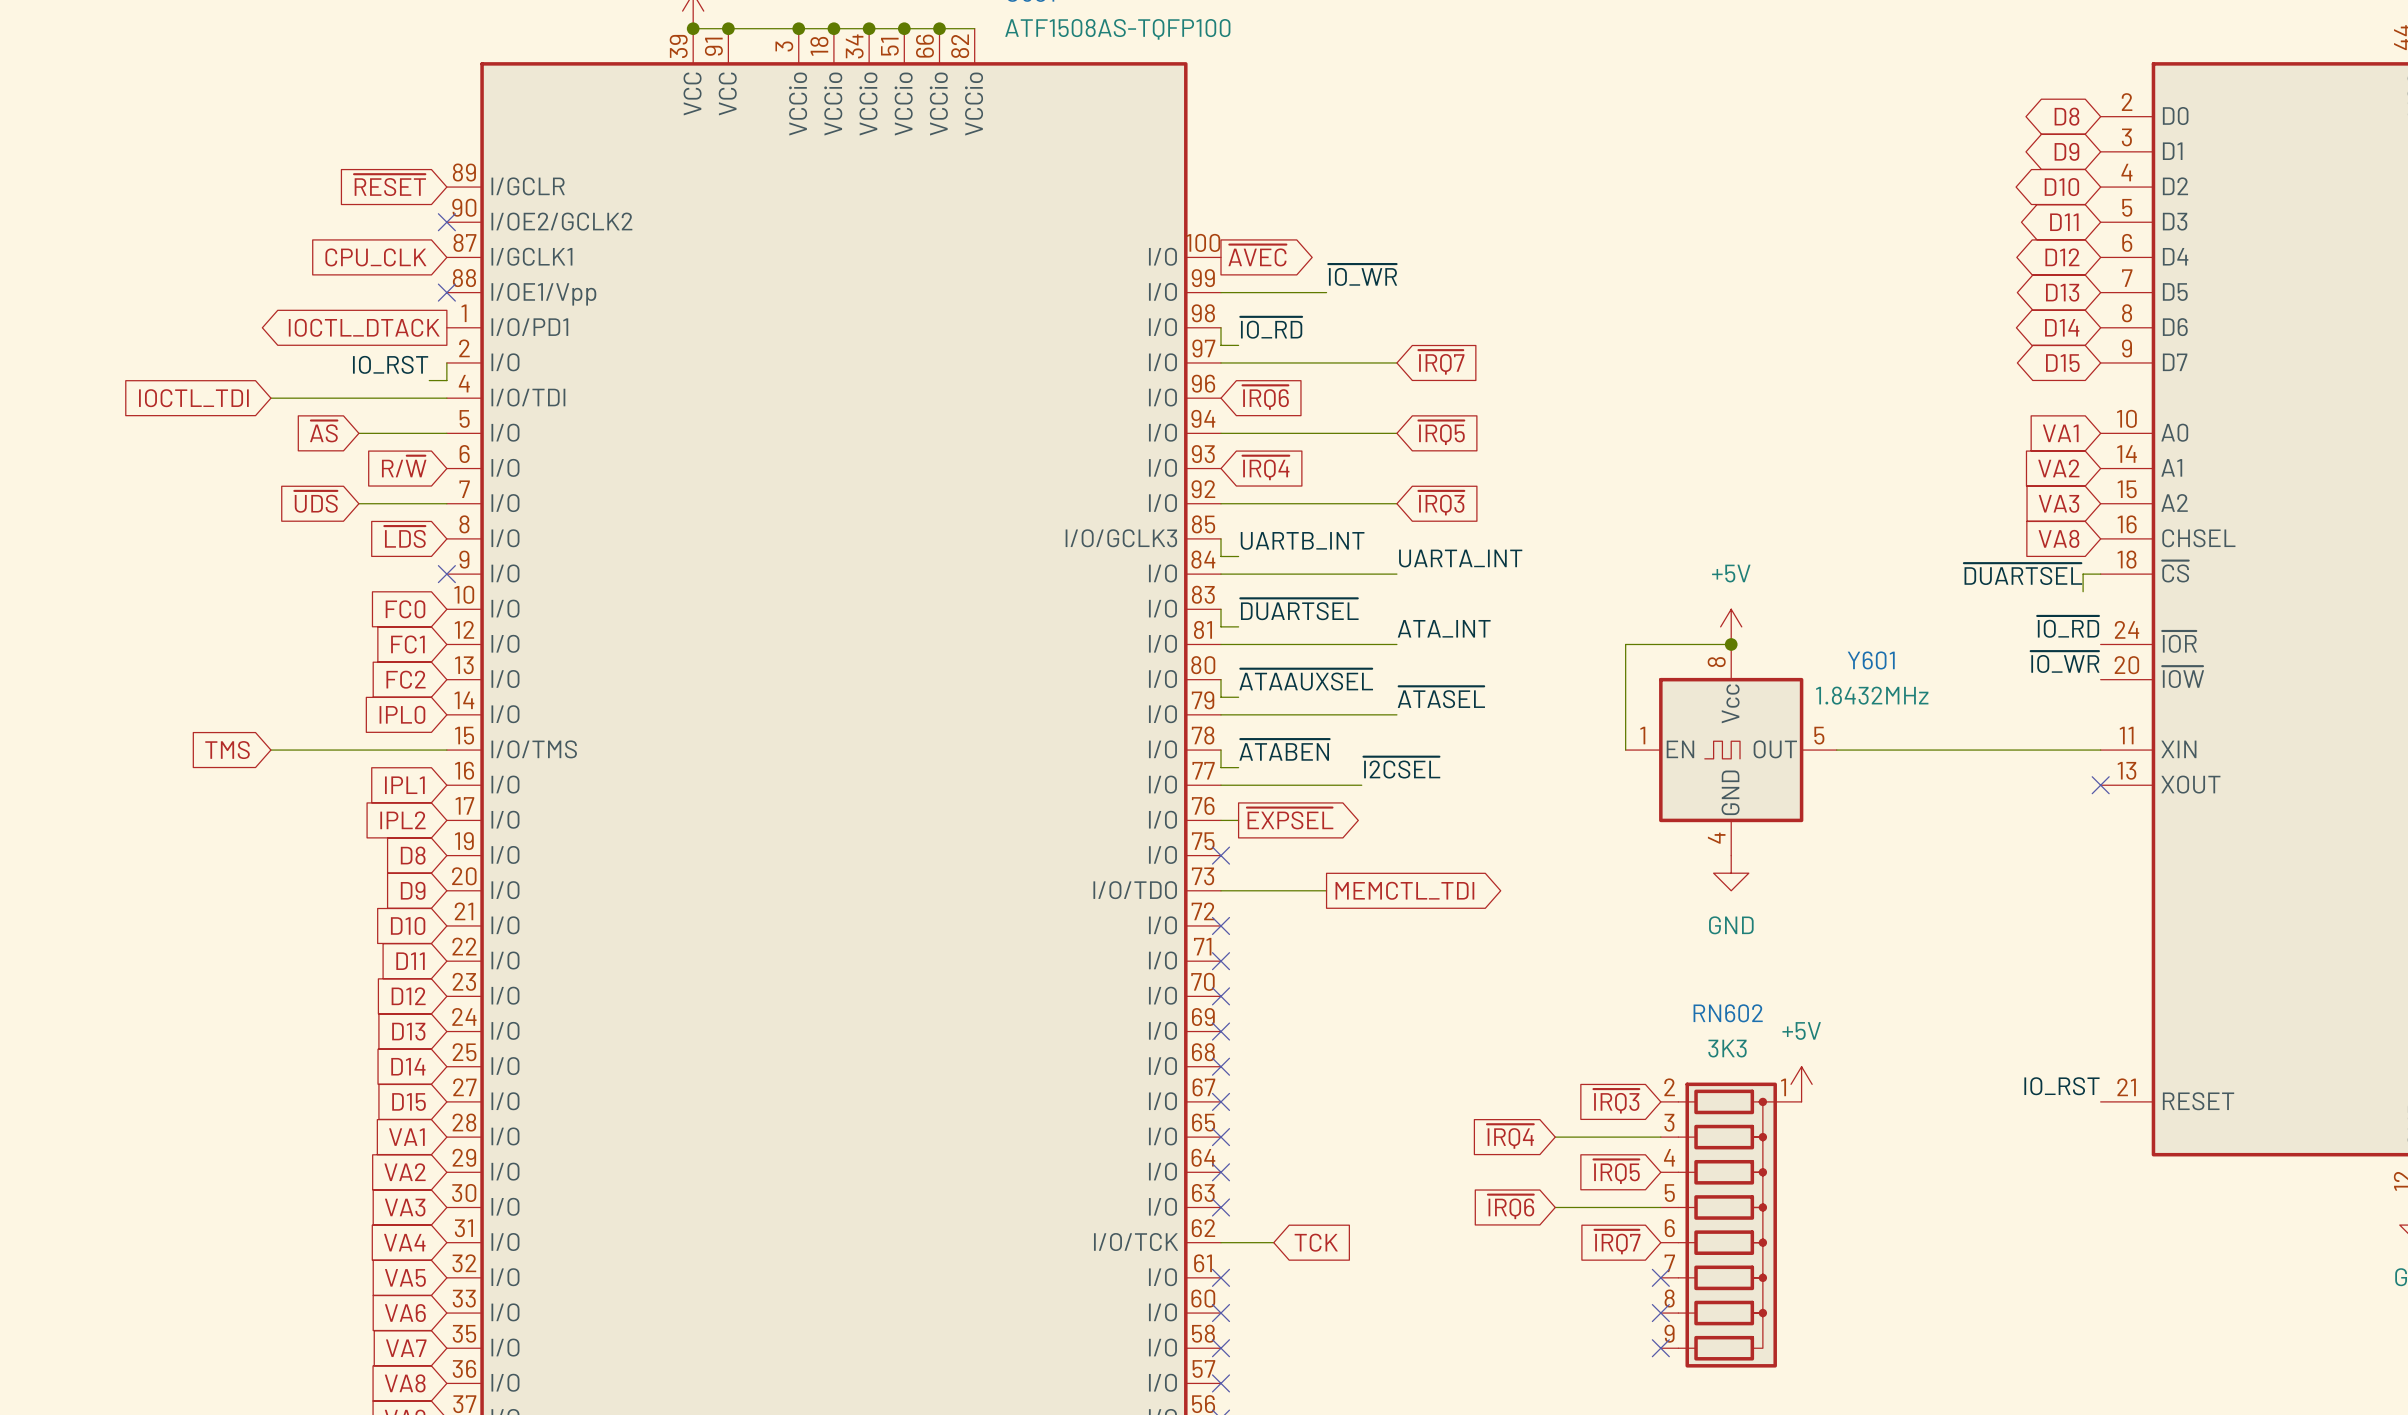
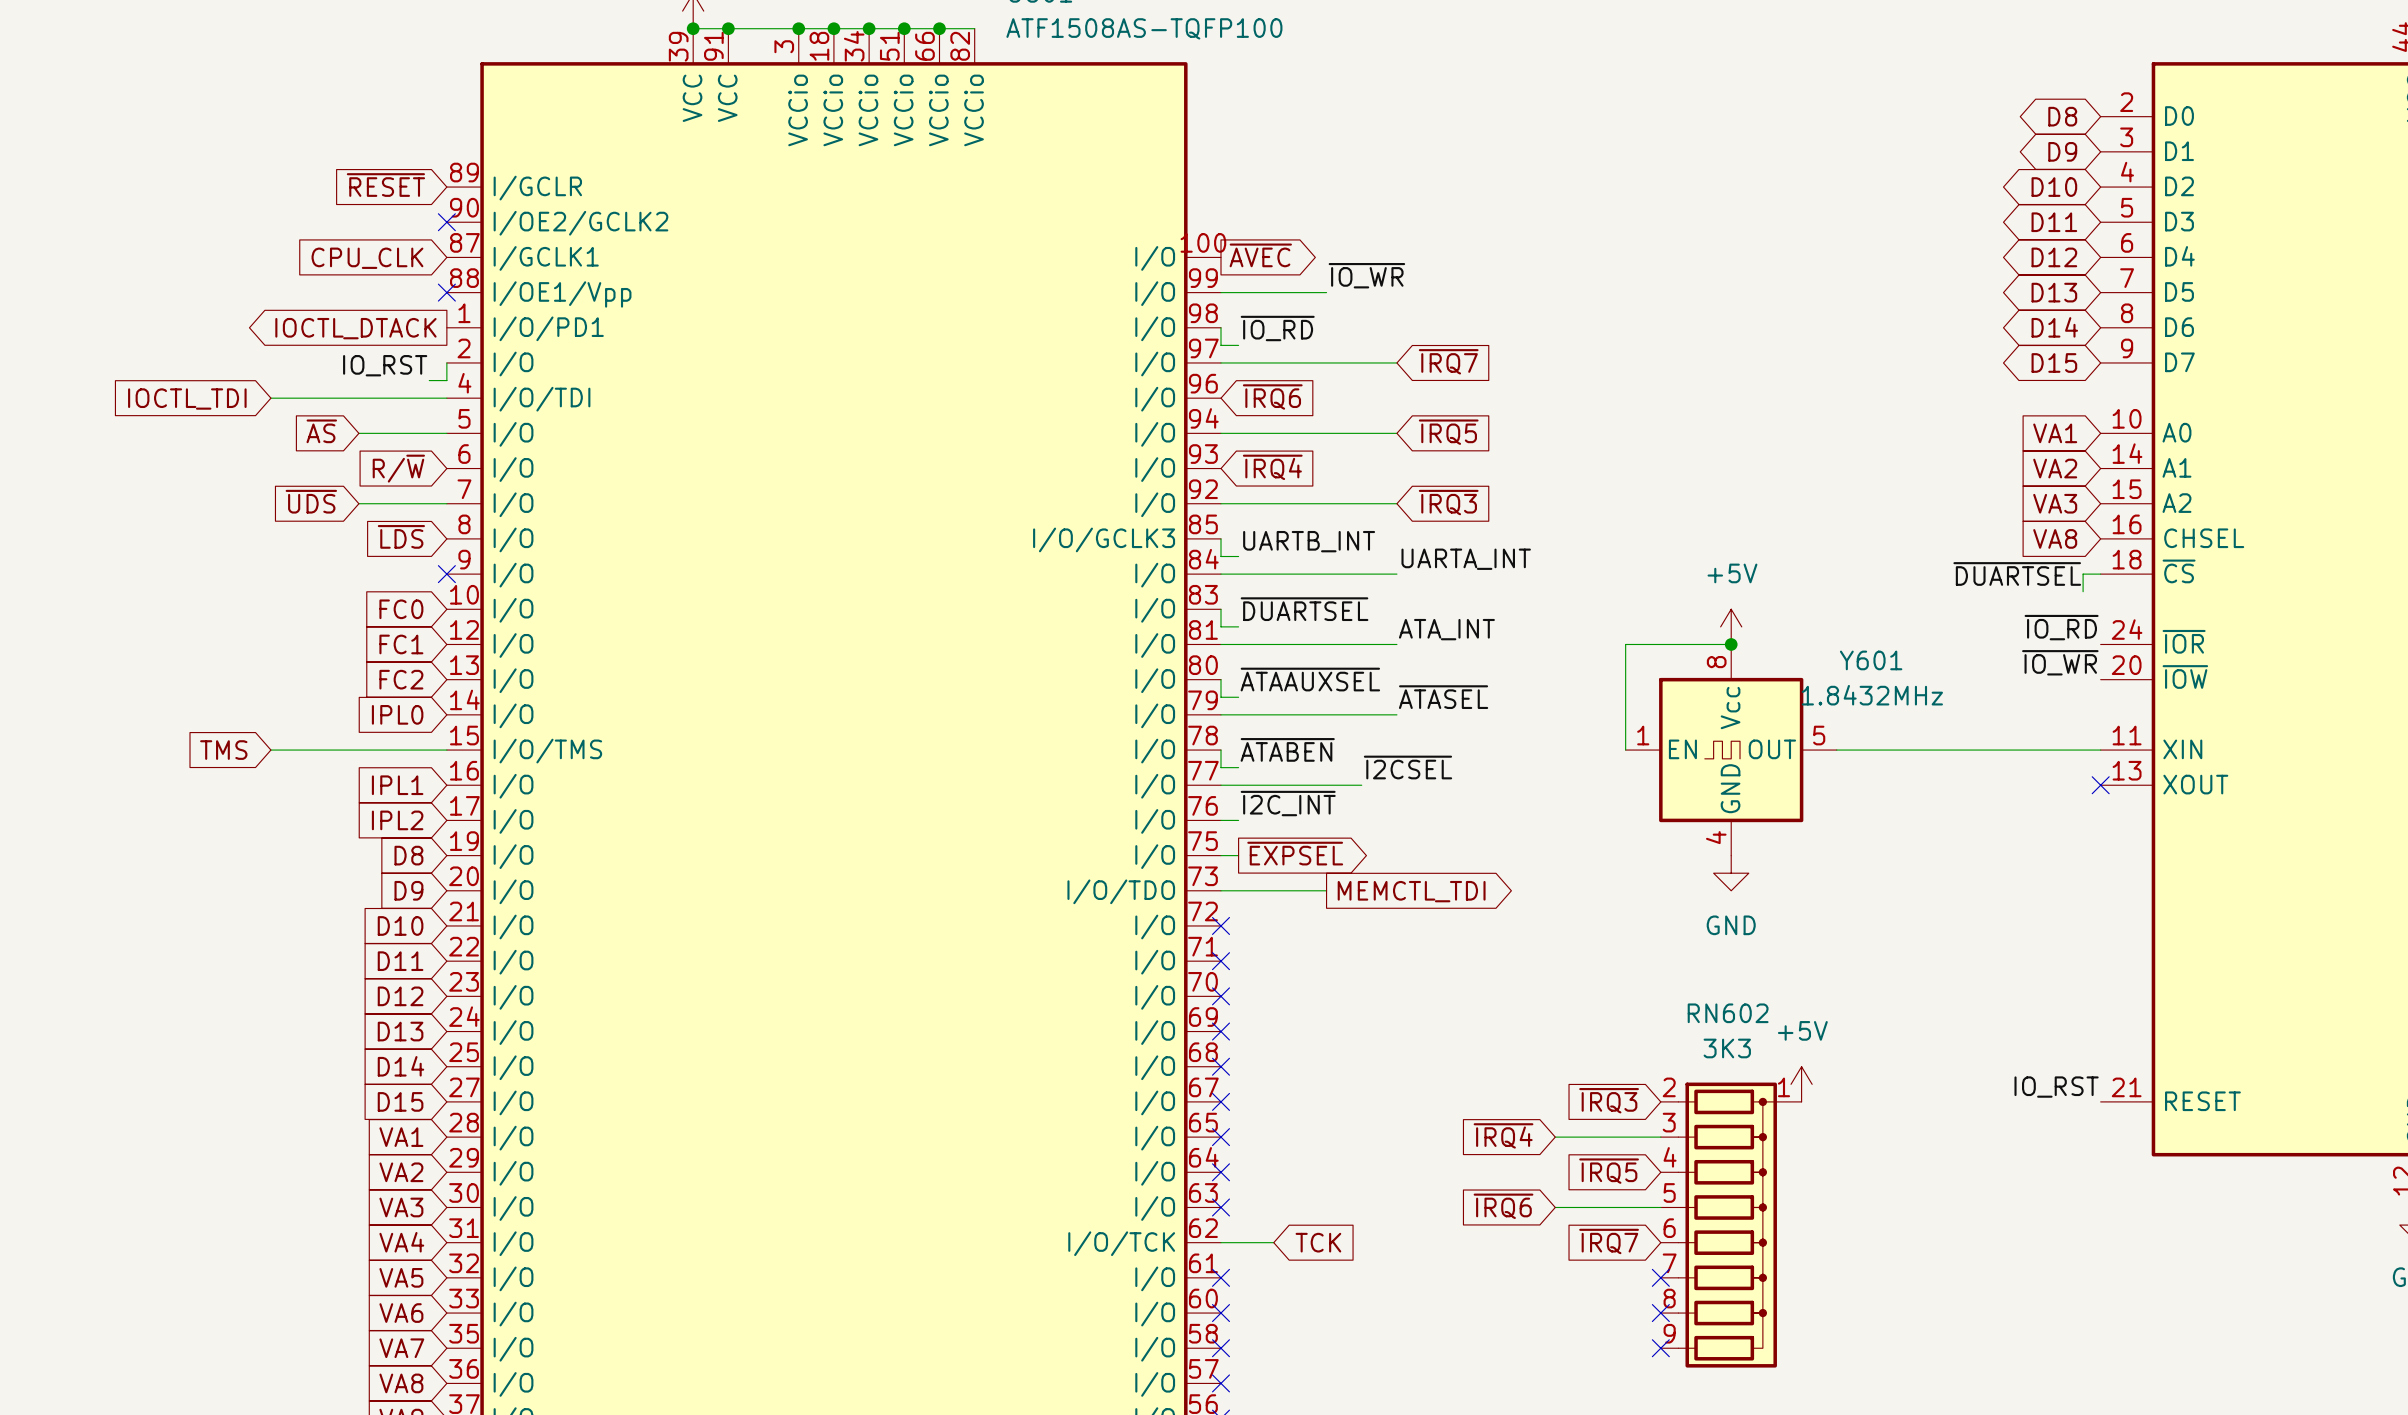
label: none -> ~{I2C_INT} (1288, 803)
global label position: ~{EXPSEL} (1290, 818) -> ~{EXPSEL} (1295, 853)
wire: none -> (1220, 855) (1238, 855)
no-connect mark: (1220, 855) -> none

